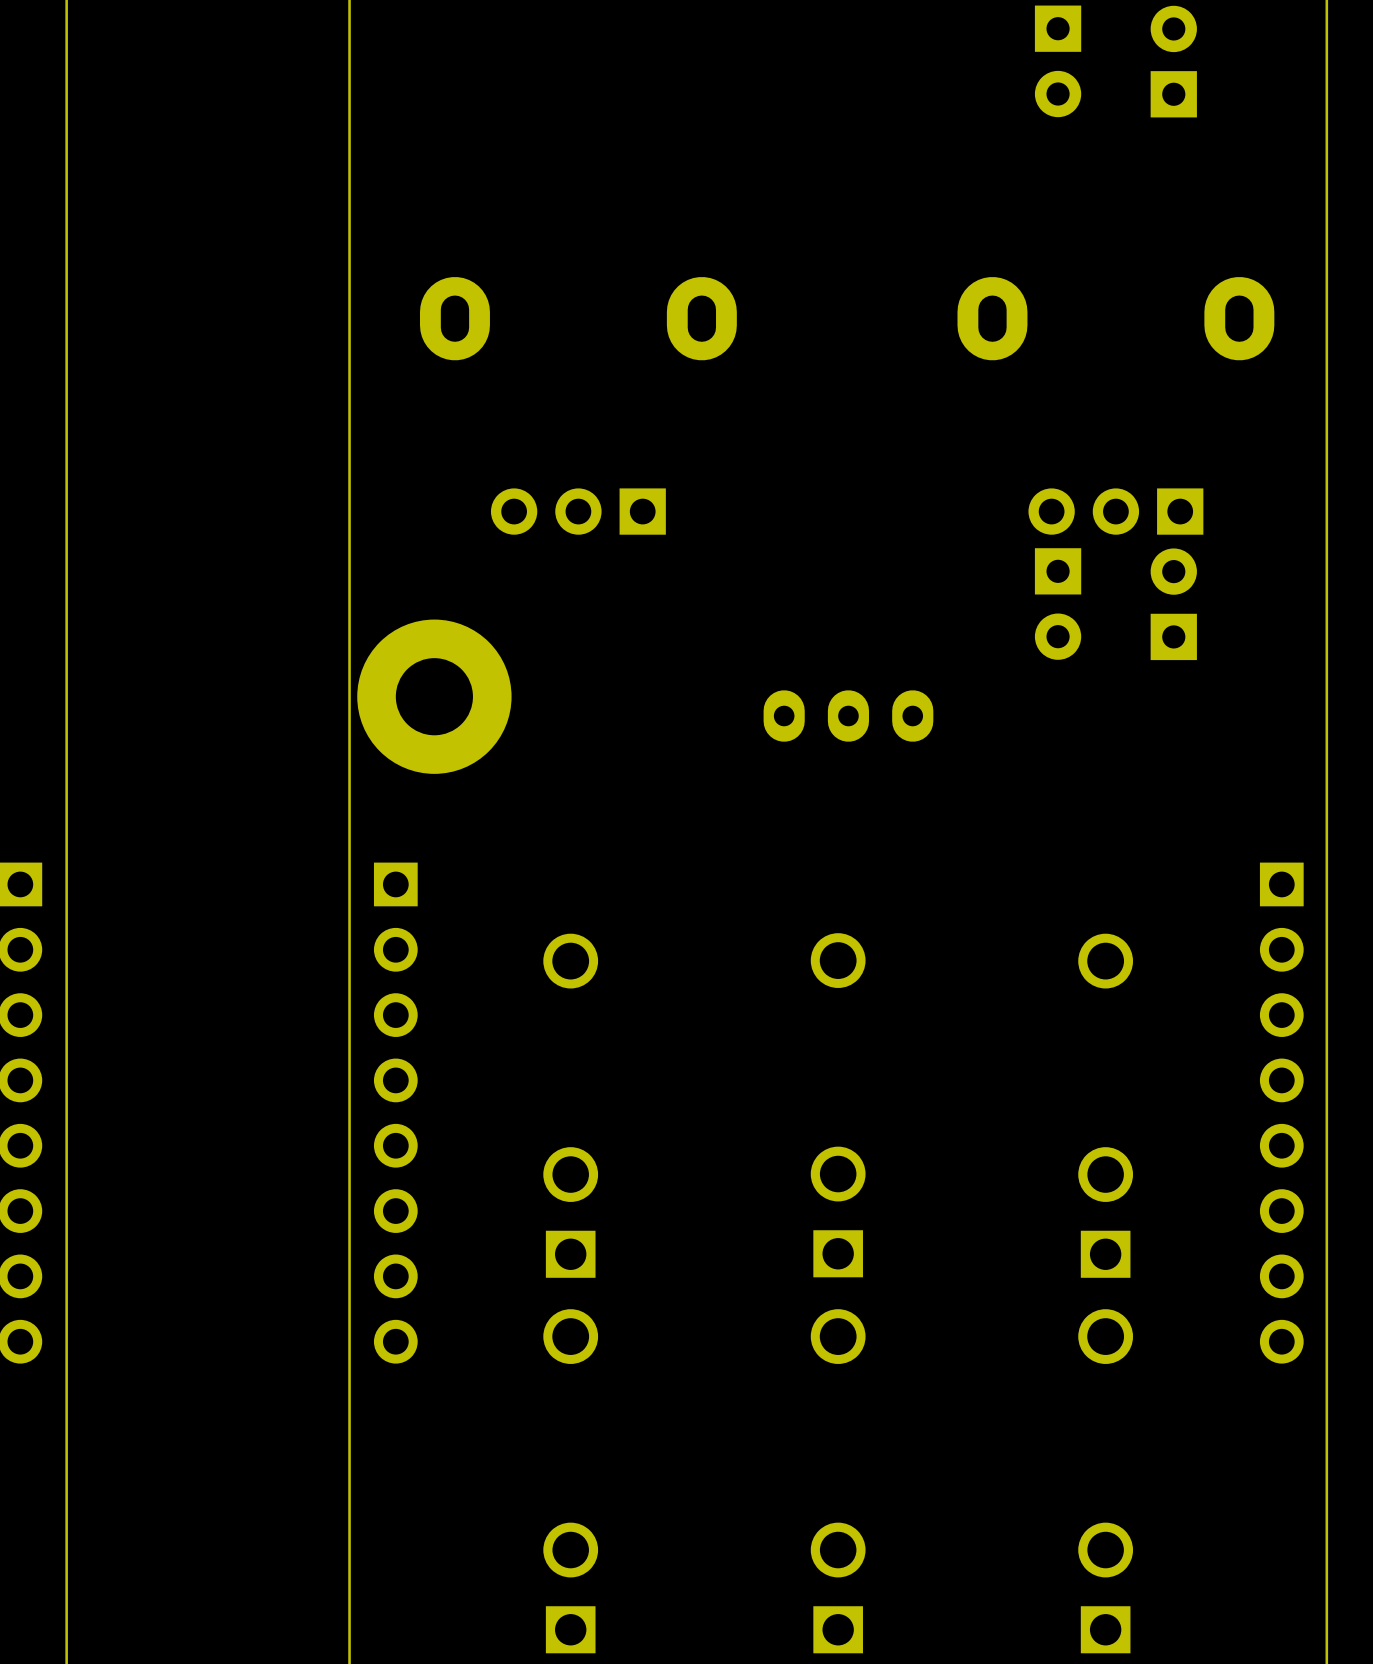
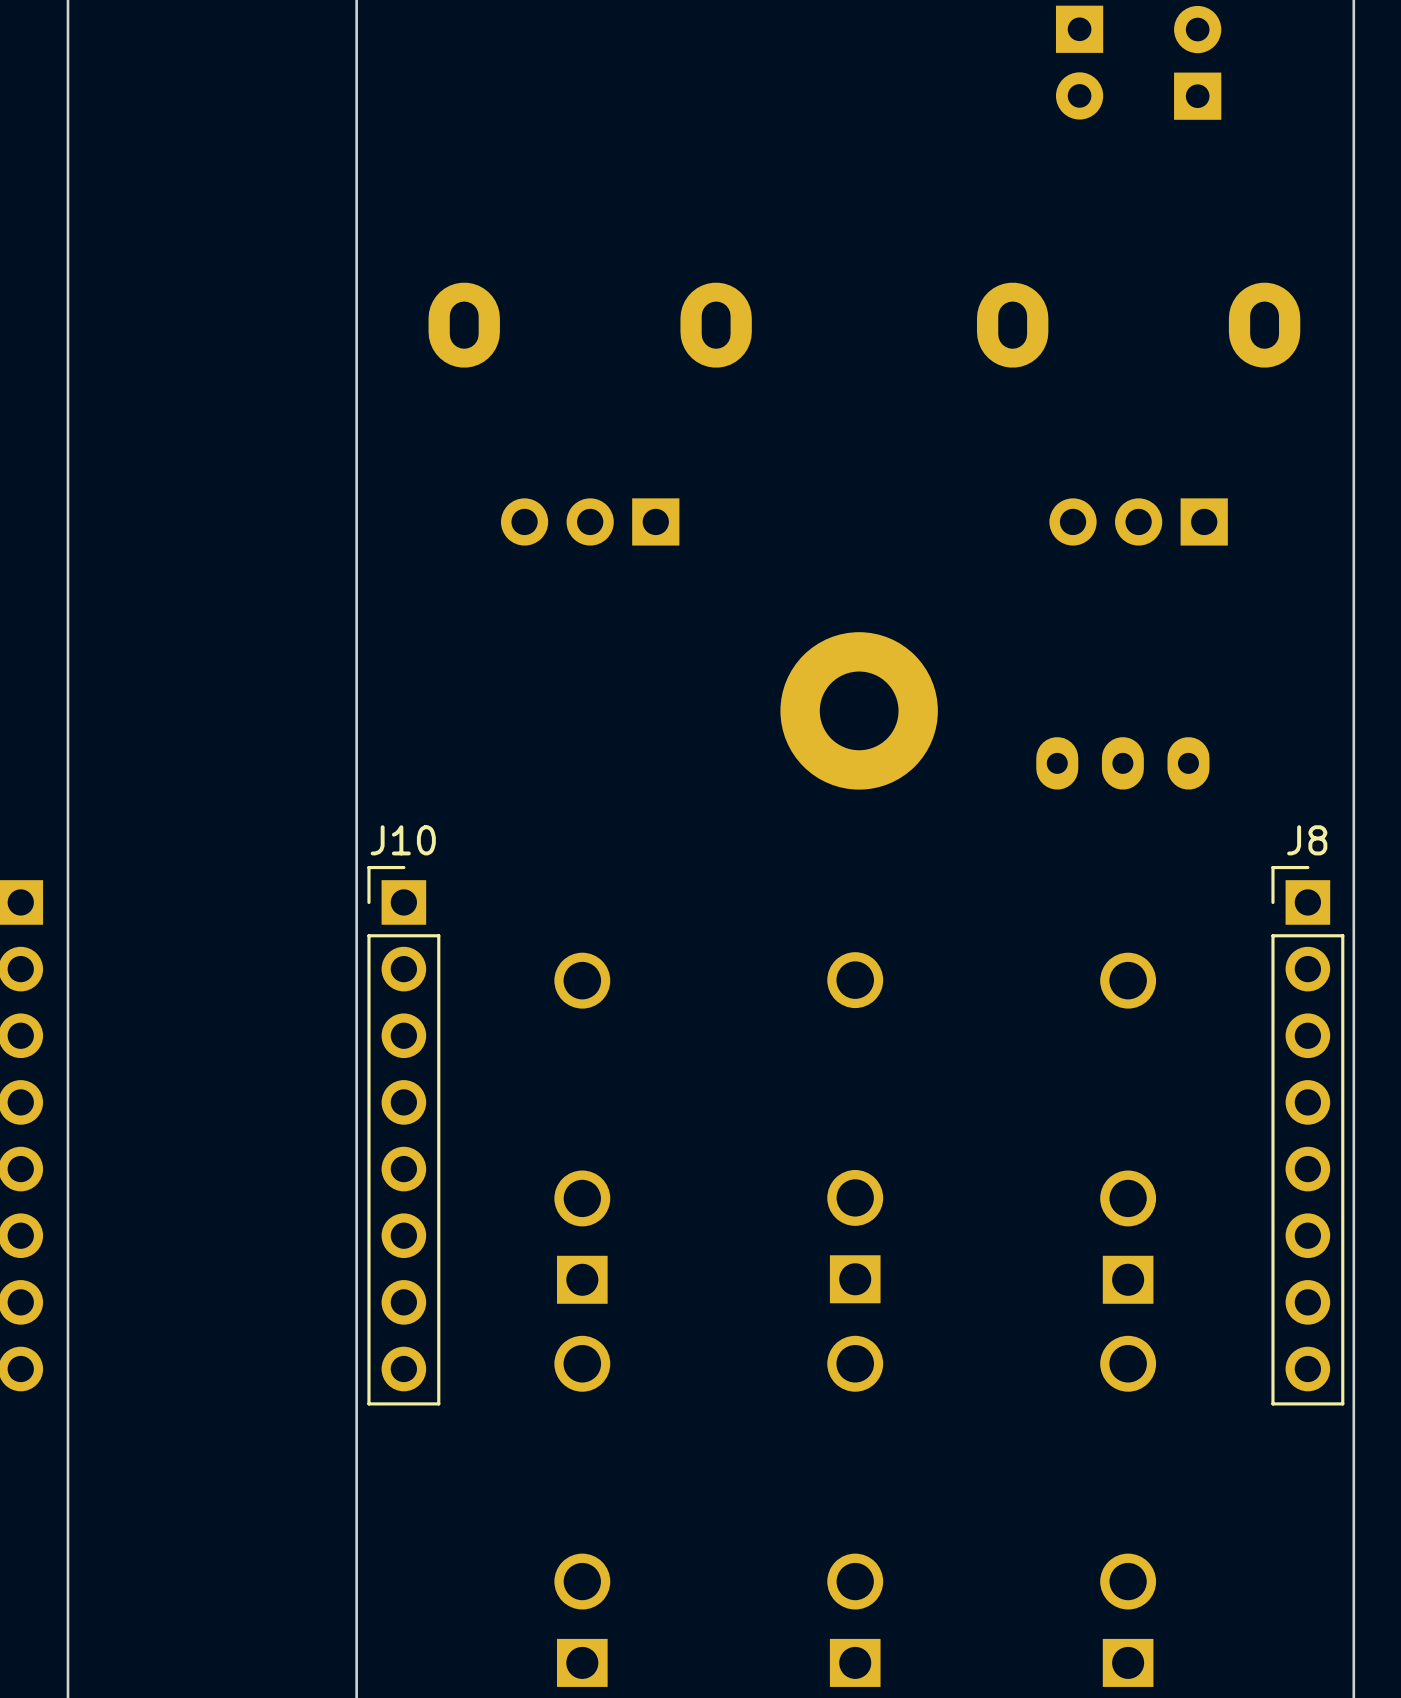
part: (1058, 604) -> none
part: (1173, 604) -> none
part footprint: [763, 690, 934, 742] -> [780, 632, 938, 790]
part: (434, 696) -> none
part: none -> (1122, 763)
J10: none -> (403, 1135)
J8: none -> (1307, 1135)

